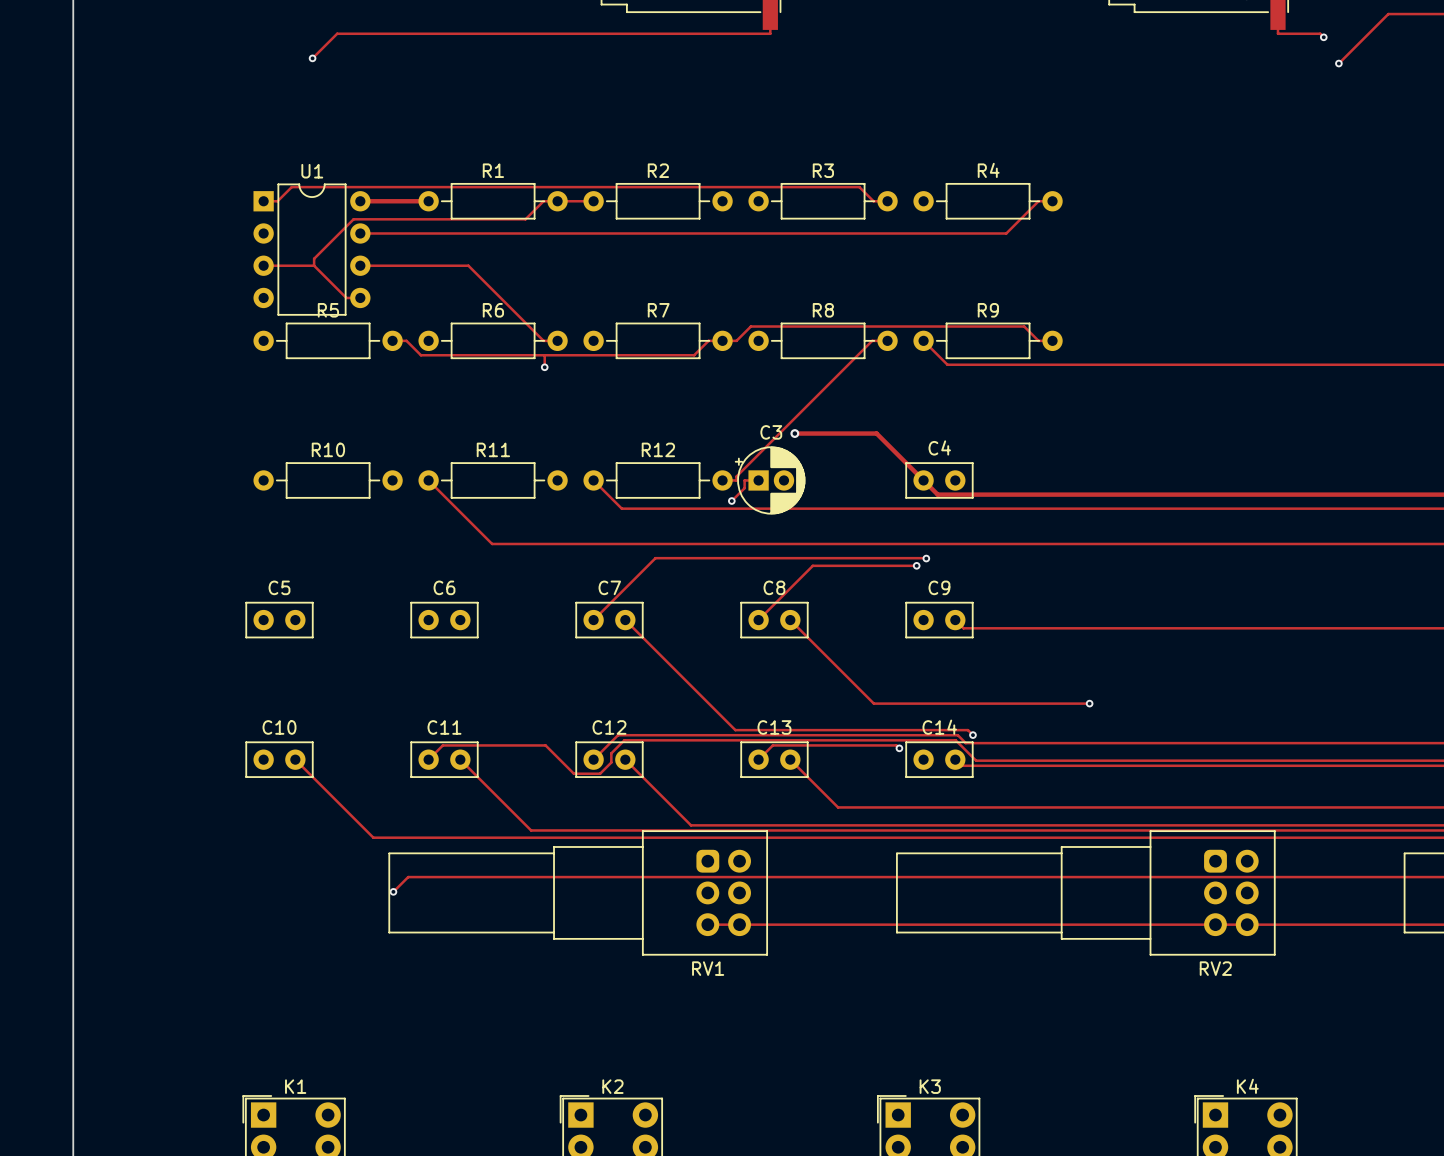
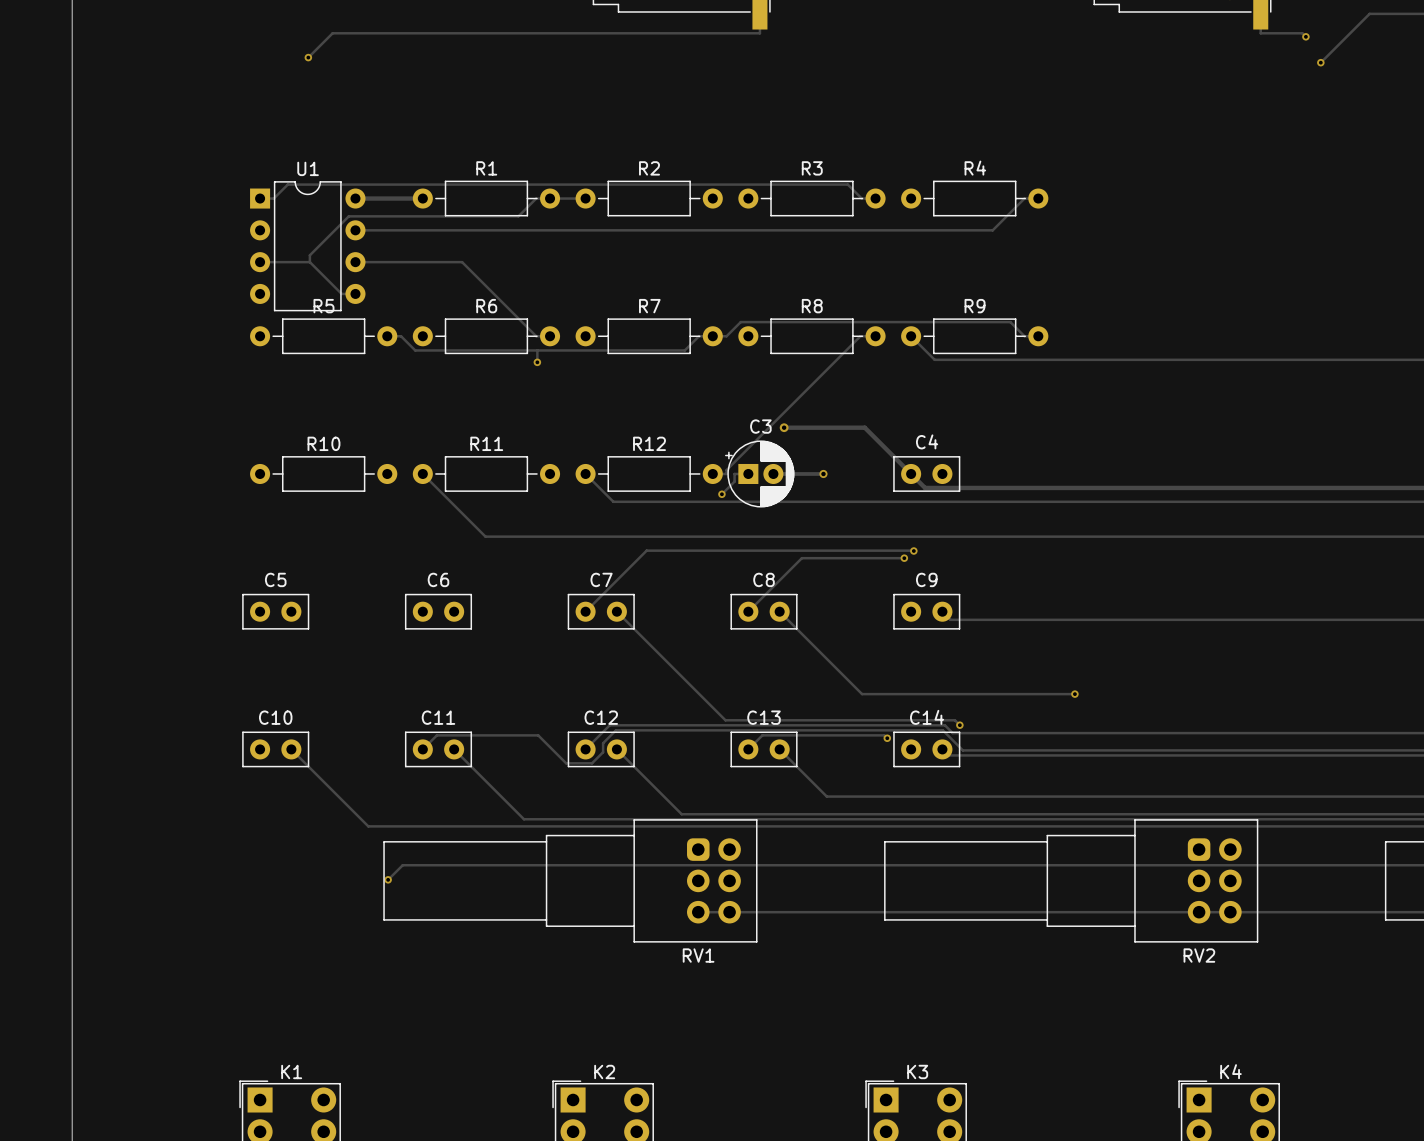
track: none -> (773, 473) (823, 473)
via: none -> (823, 473)

